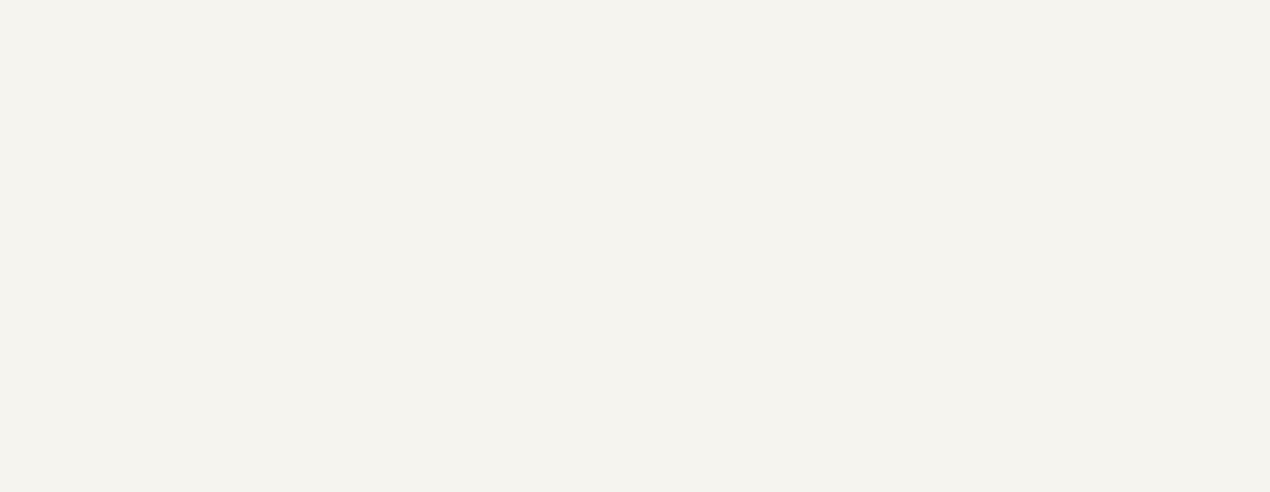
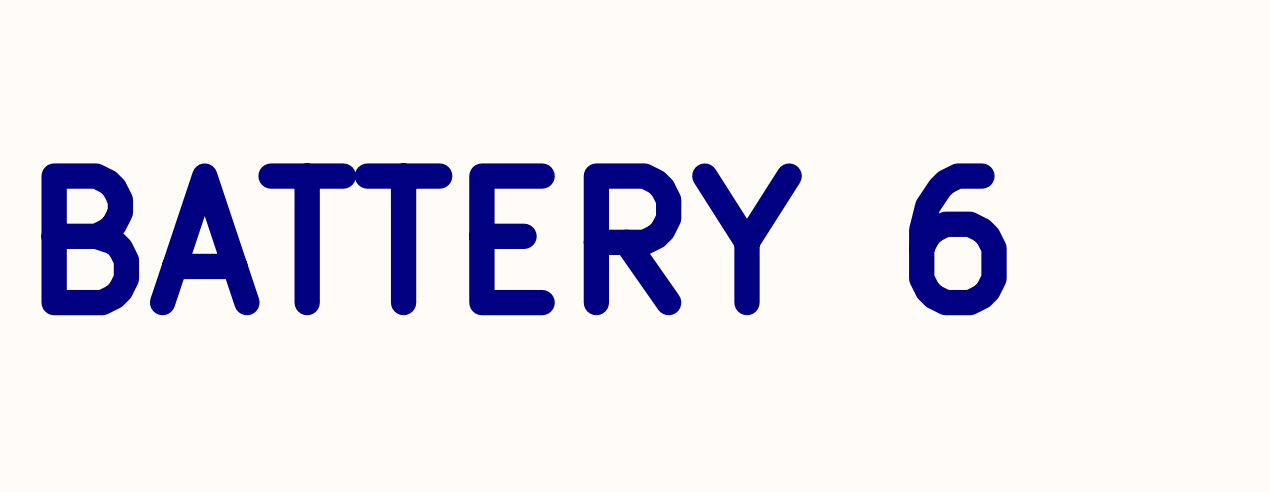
text: none -> BATTERY 6 (524, 239)

